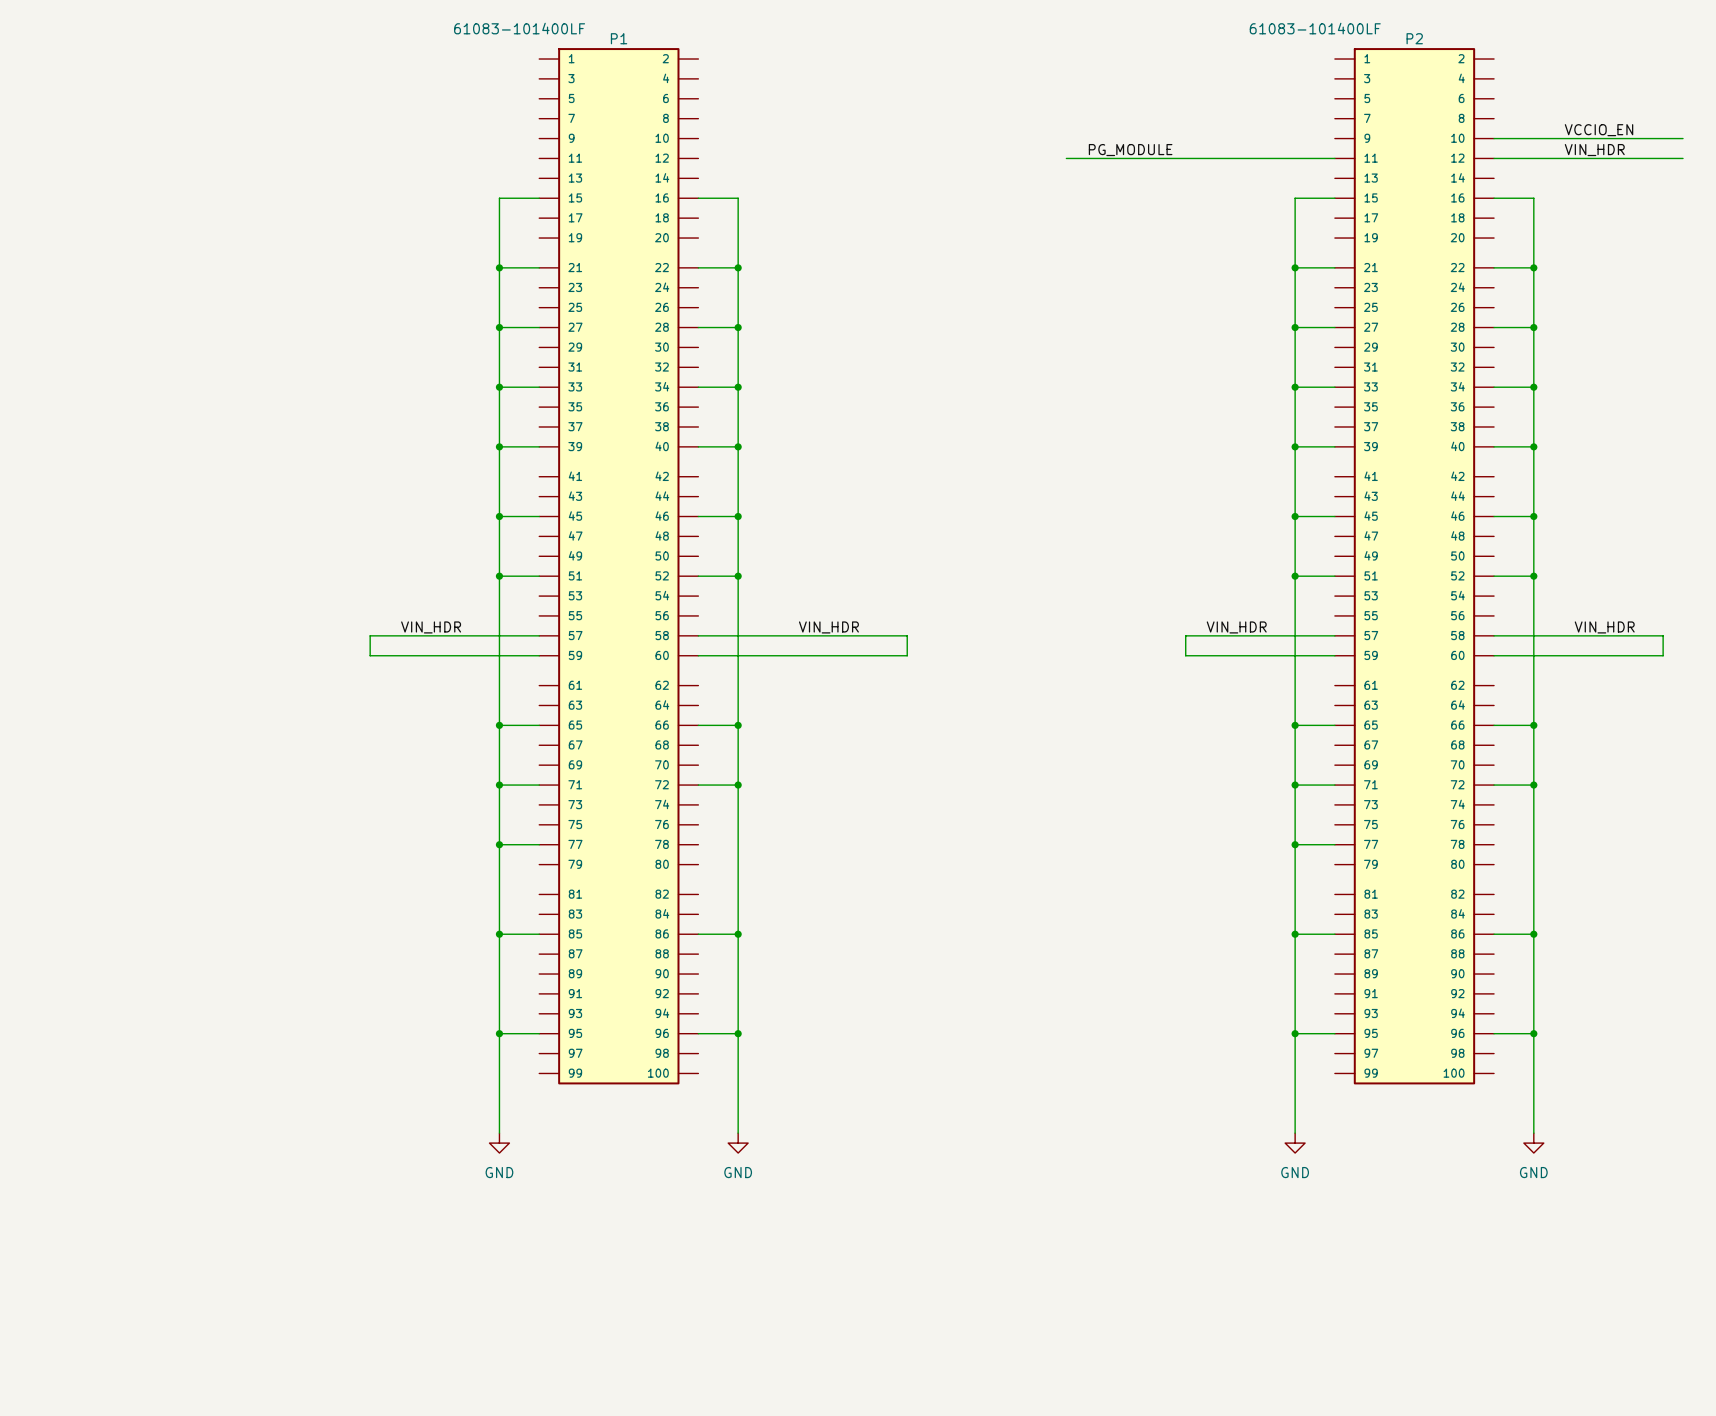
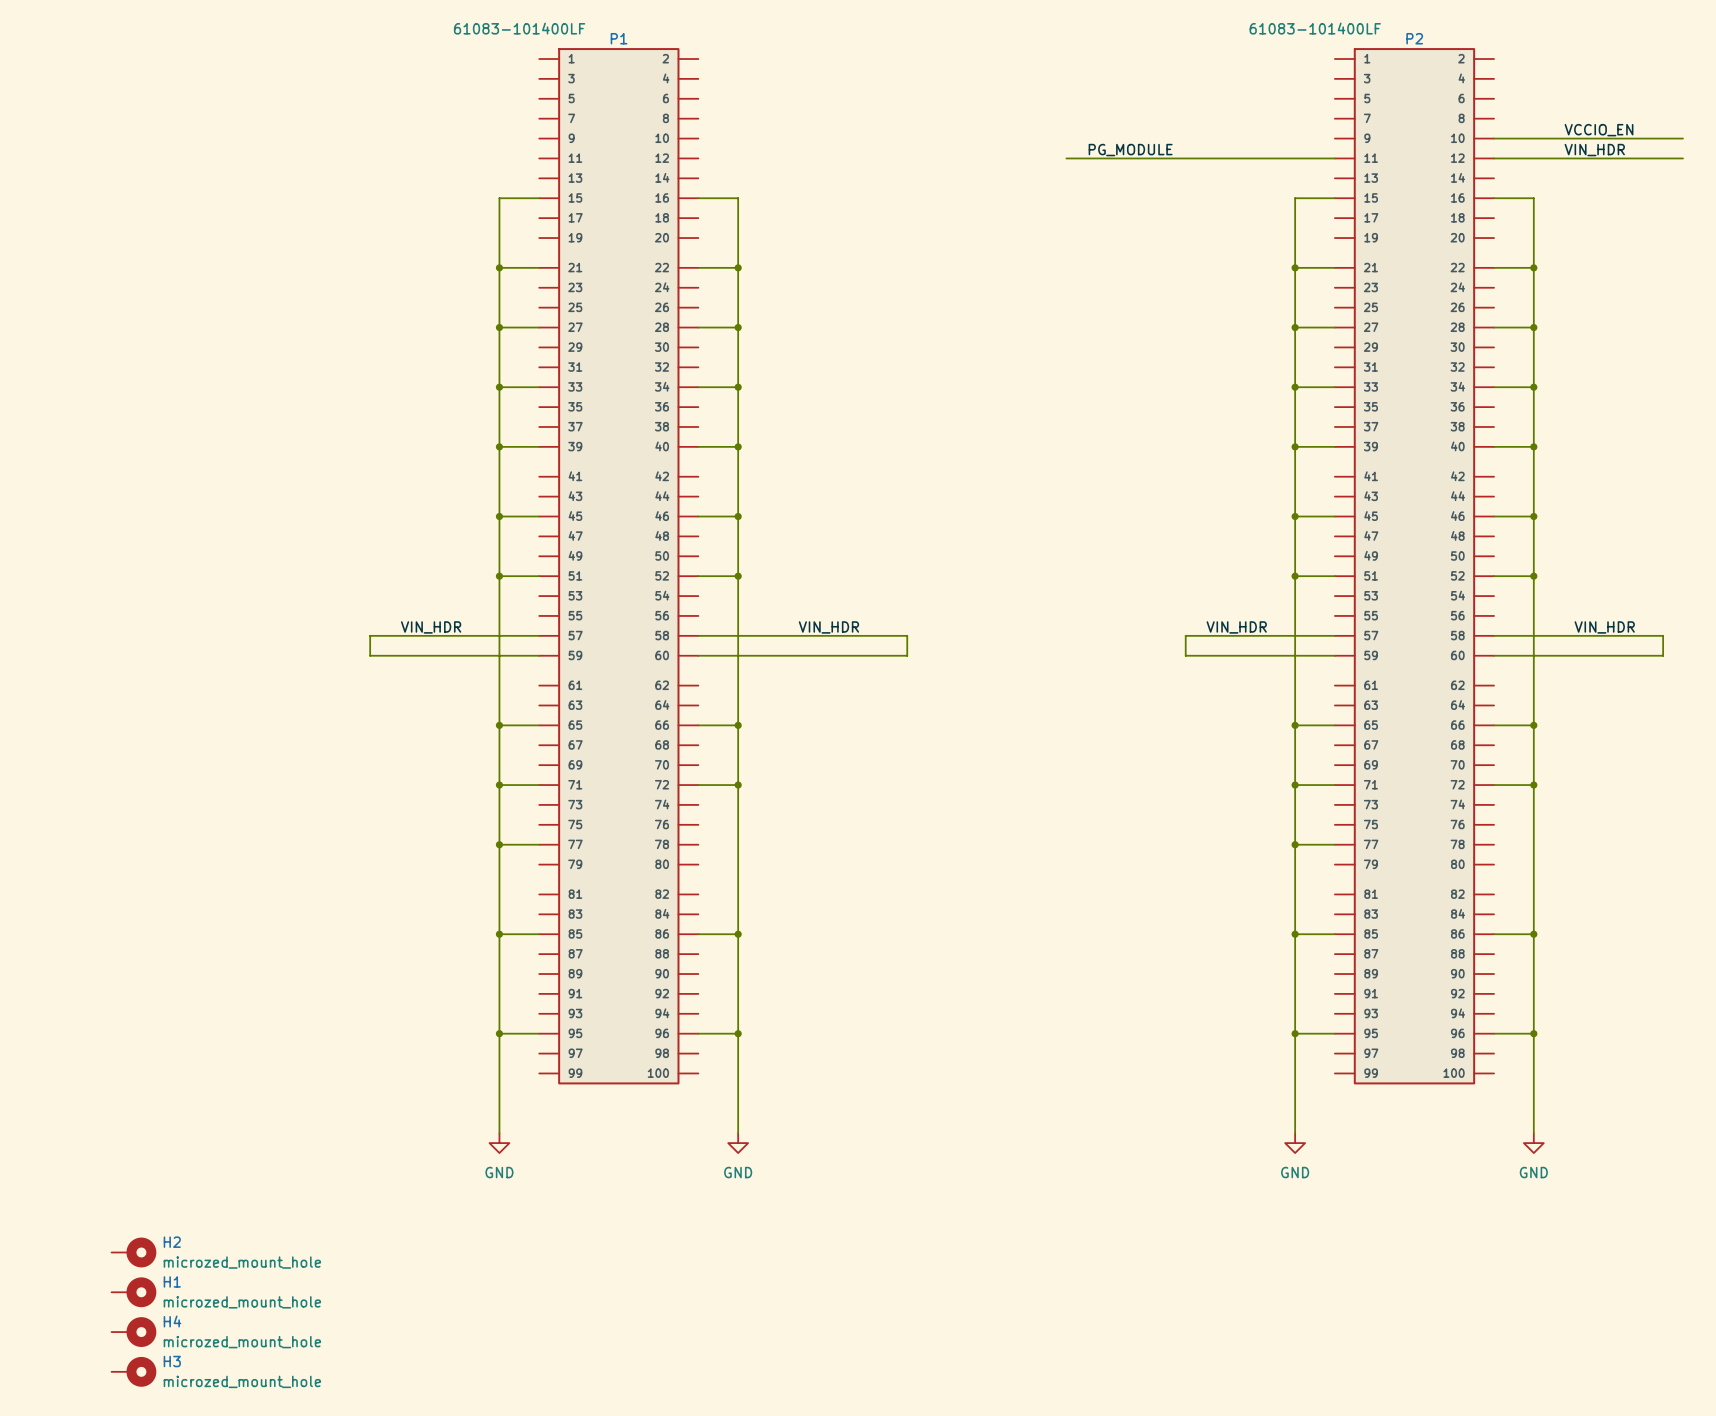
H2: none -> microzed_mount_hole (133, 1252)
H1: none -> microzed_mount_hole (133, 1292)
H4: none -> microzed_mount_hole (133, 1332)
H3: none -> microzed_mount_hole (133, 1371)

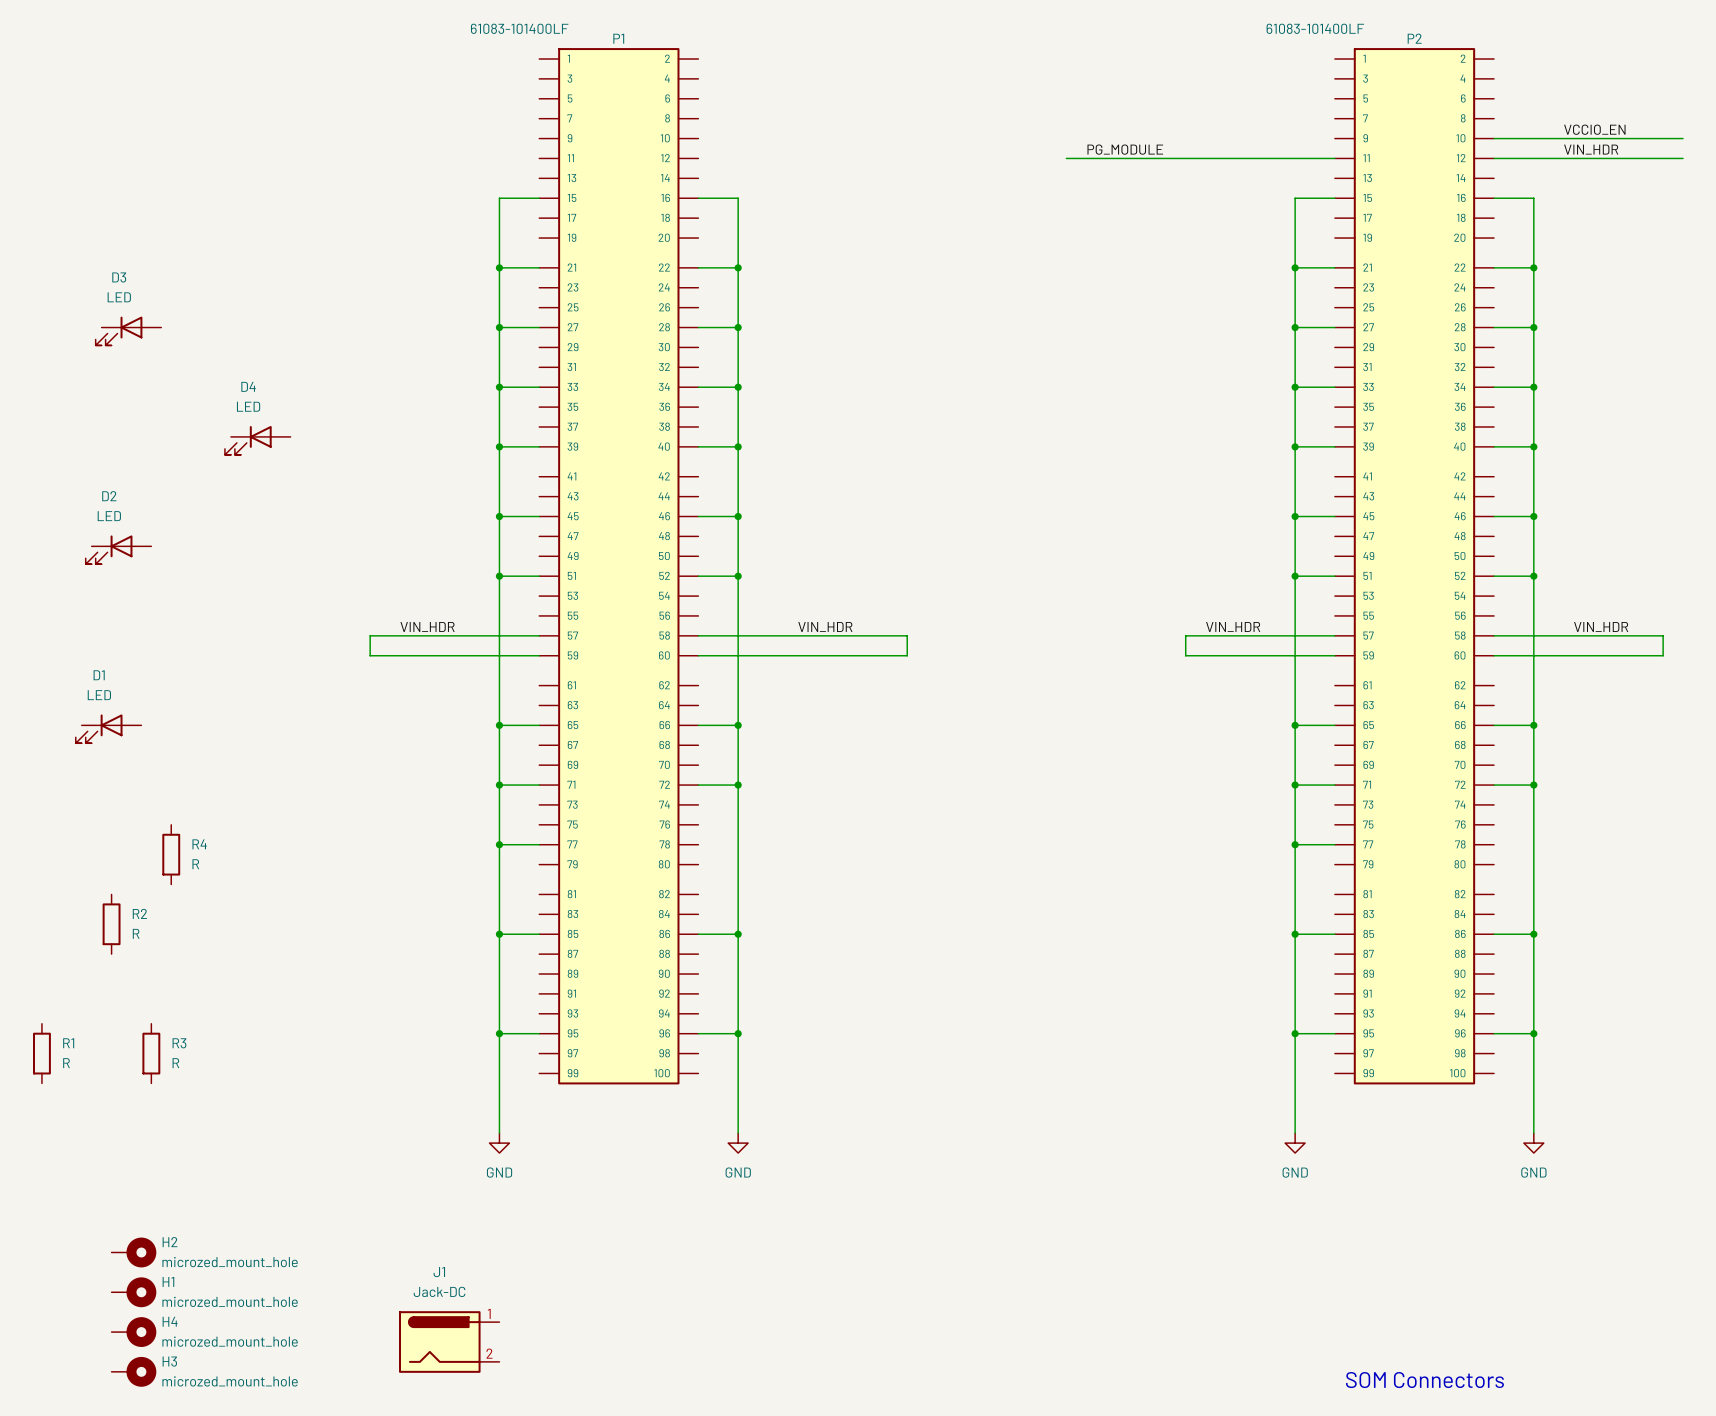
D3: none -> LED (128, 331)
D4: none -> LED (257, 440)
D2: none -> LED (118, 549)
D1: none -> LED (108, 728)
R4: none -> R (171, 854)
R2: none -> R (111, 924)
R1: none -> R (41, 1053)
R3: none -> R (151, 1053)
J1: none -> Jack-DC (449, 1342)
text: none -> SOM Connectors (1424, 1380)

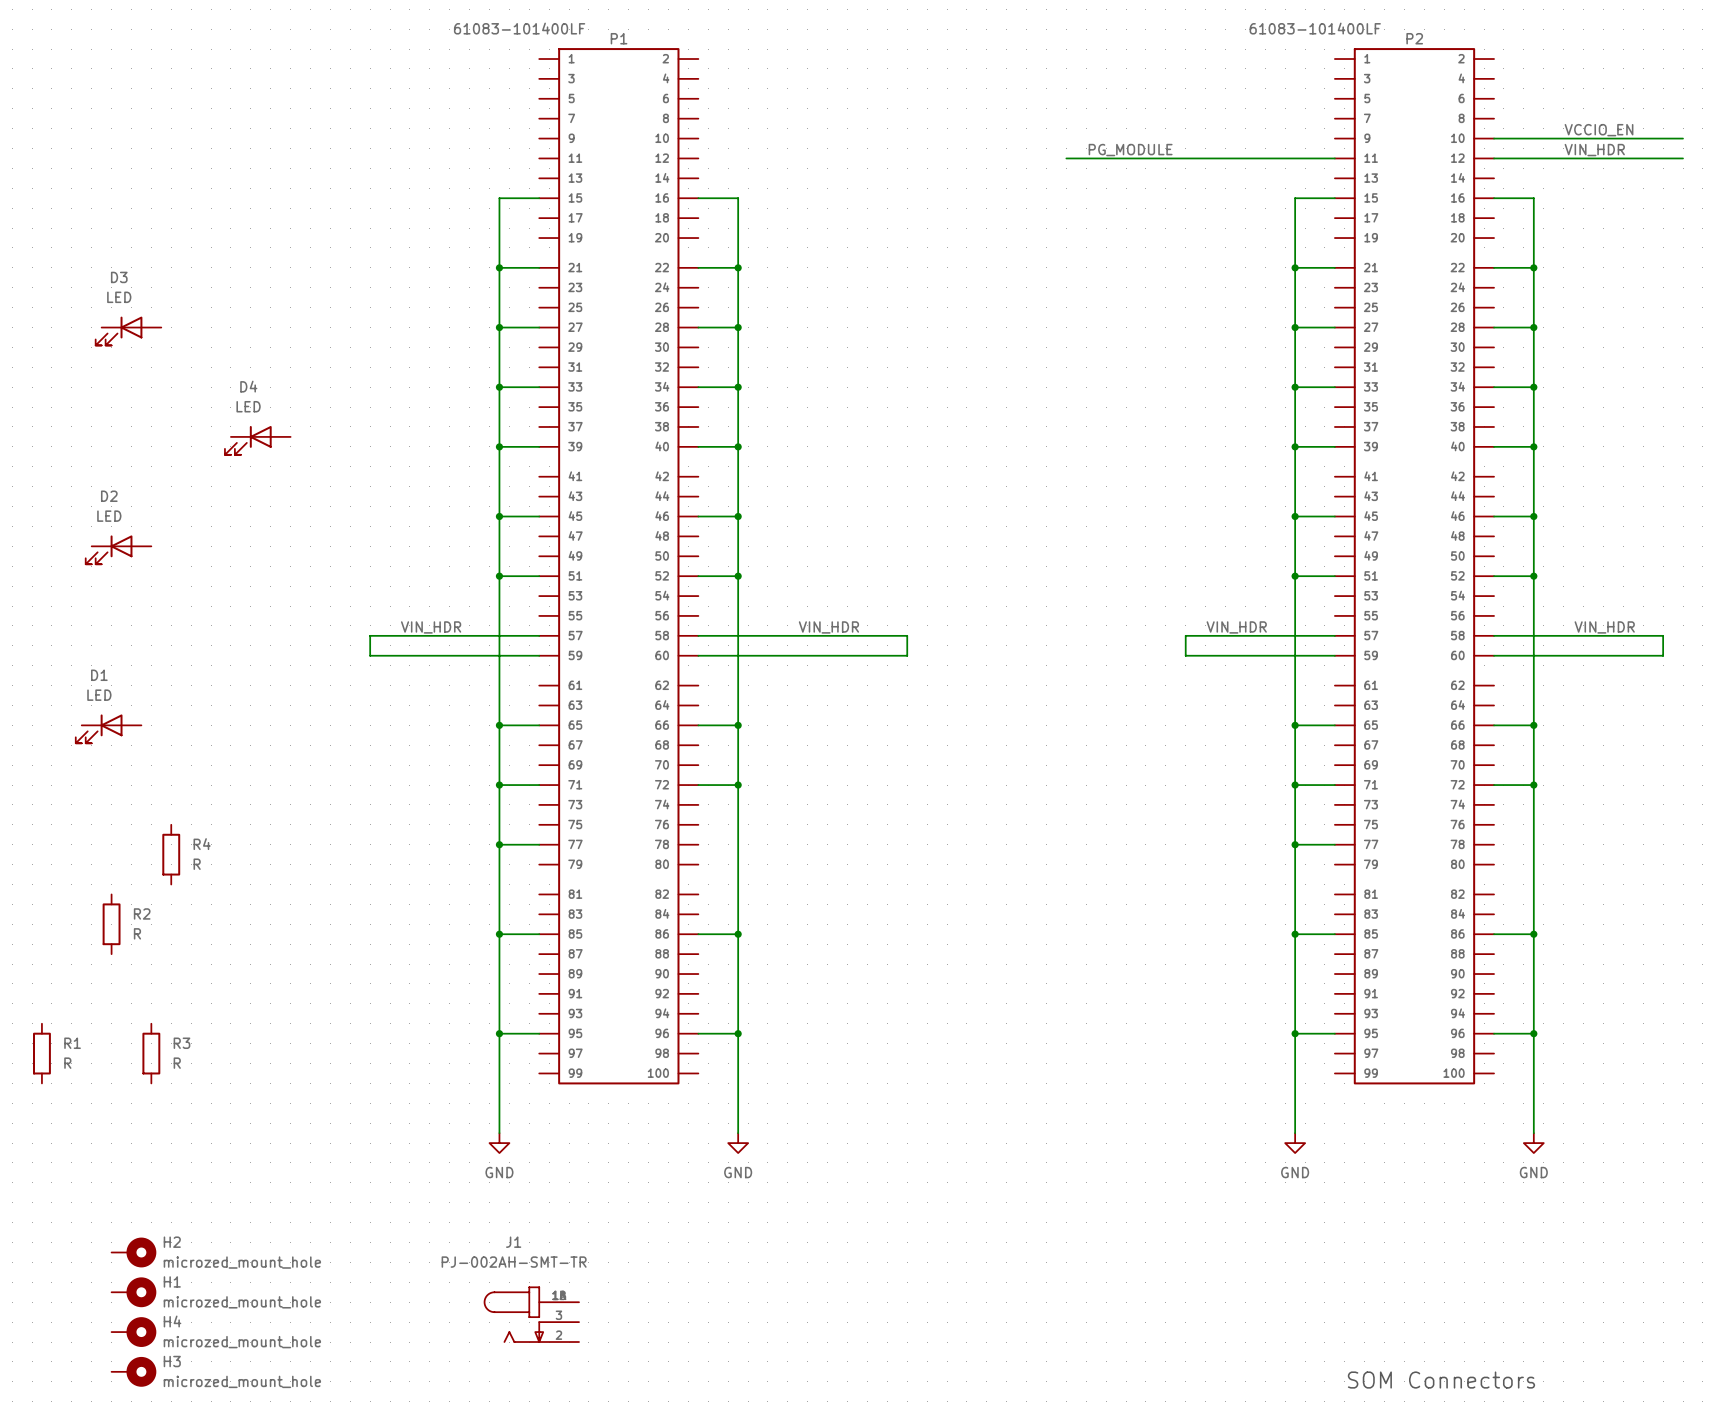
J1 value: Jack-DC (439, 1291) -> PJ-002AH-SMT-TR (514, 1262)
J1 symbol: [399, 1311, 500, 1373] -> [483, 1286, 580, 1343]

